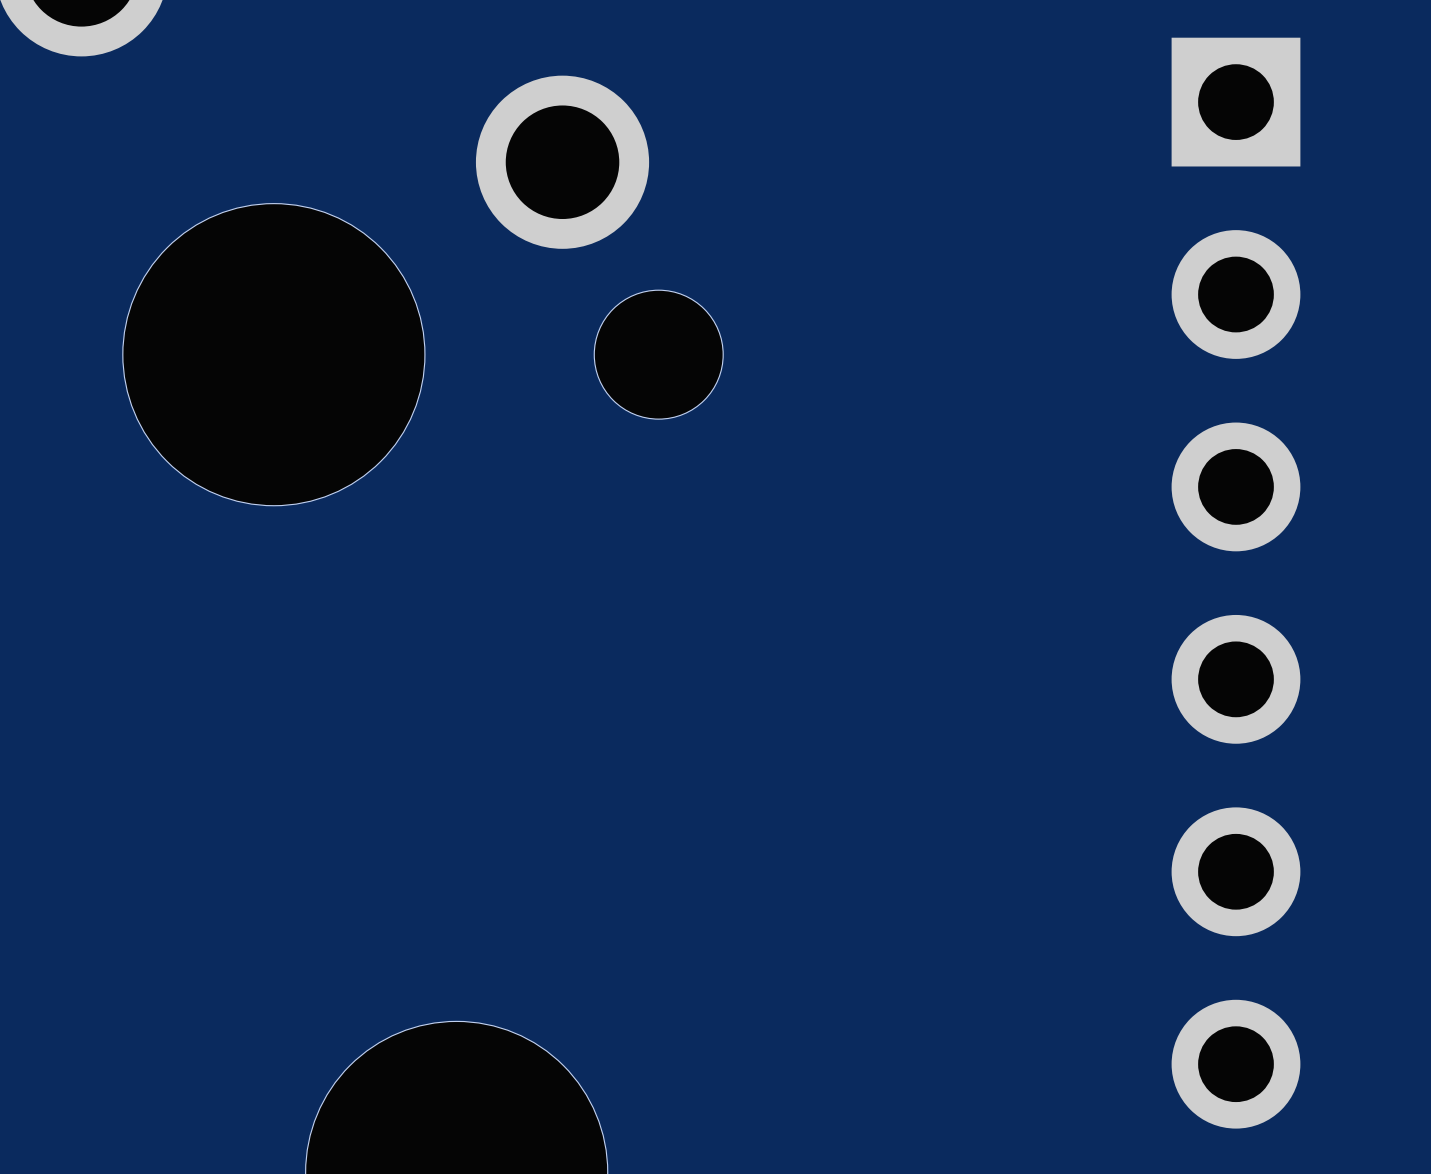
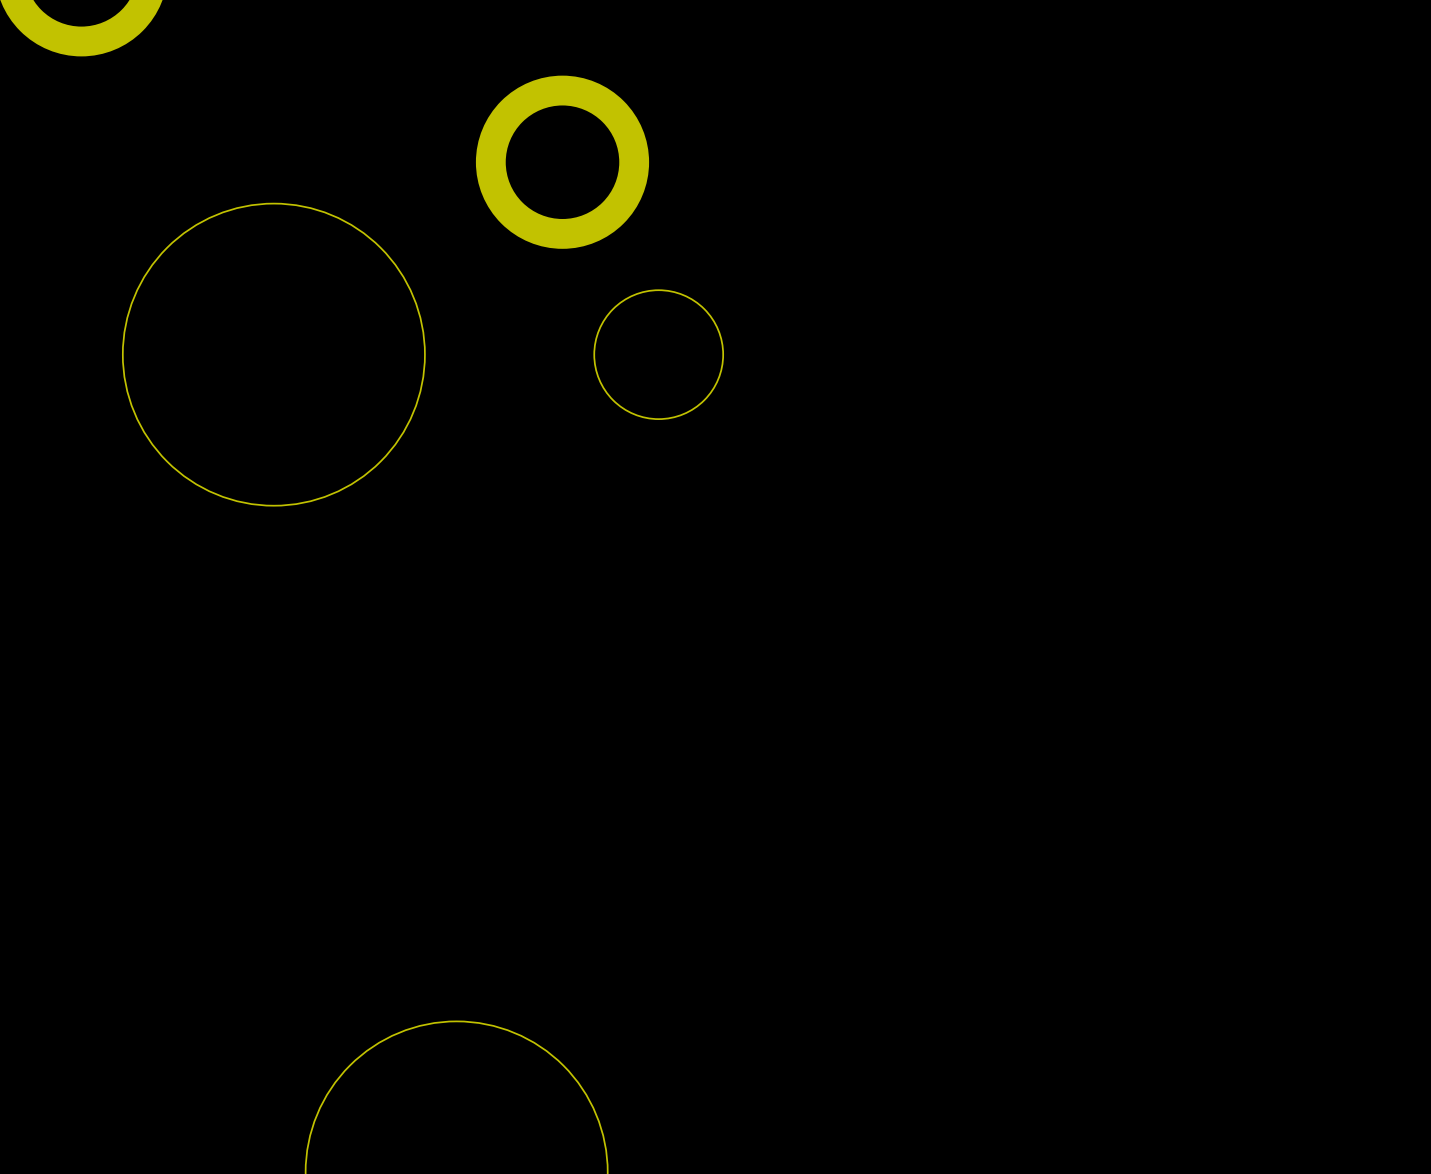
part: (1235, 583) -> none

